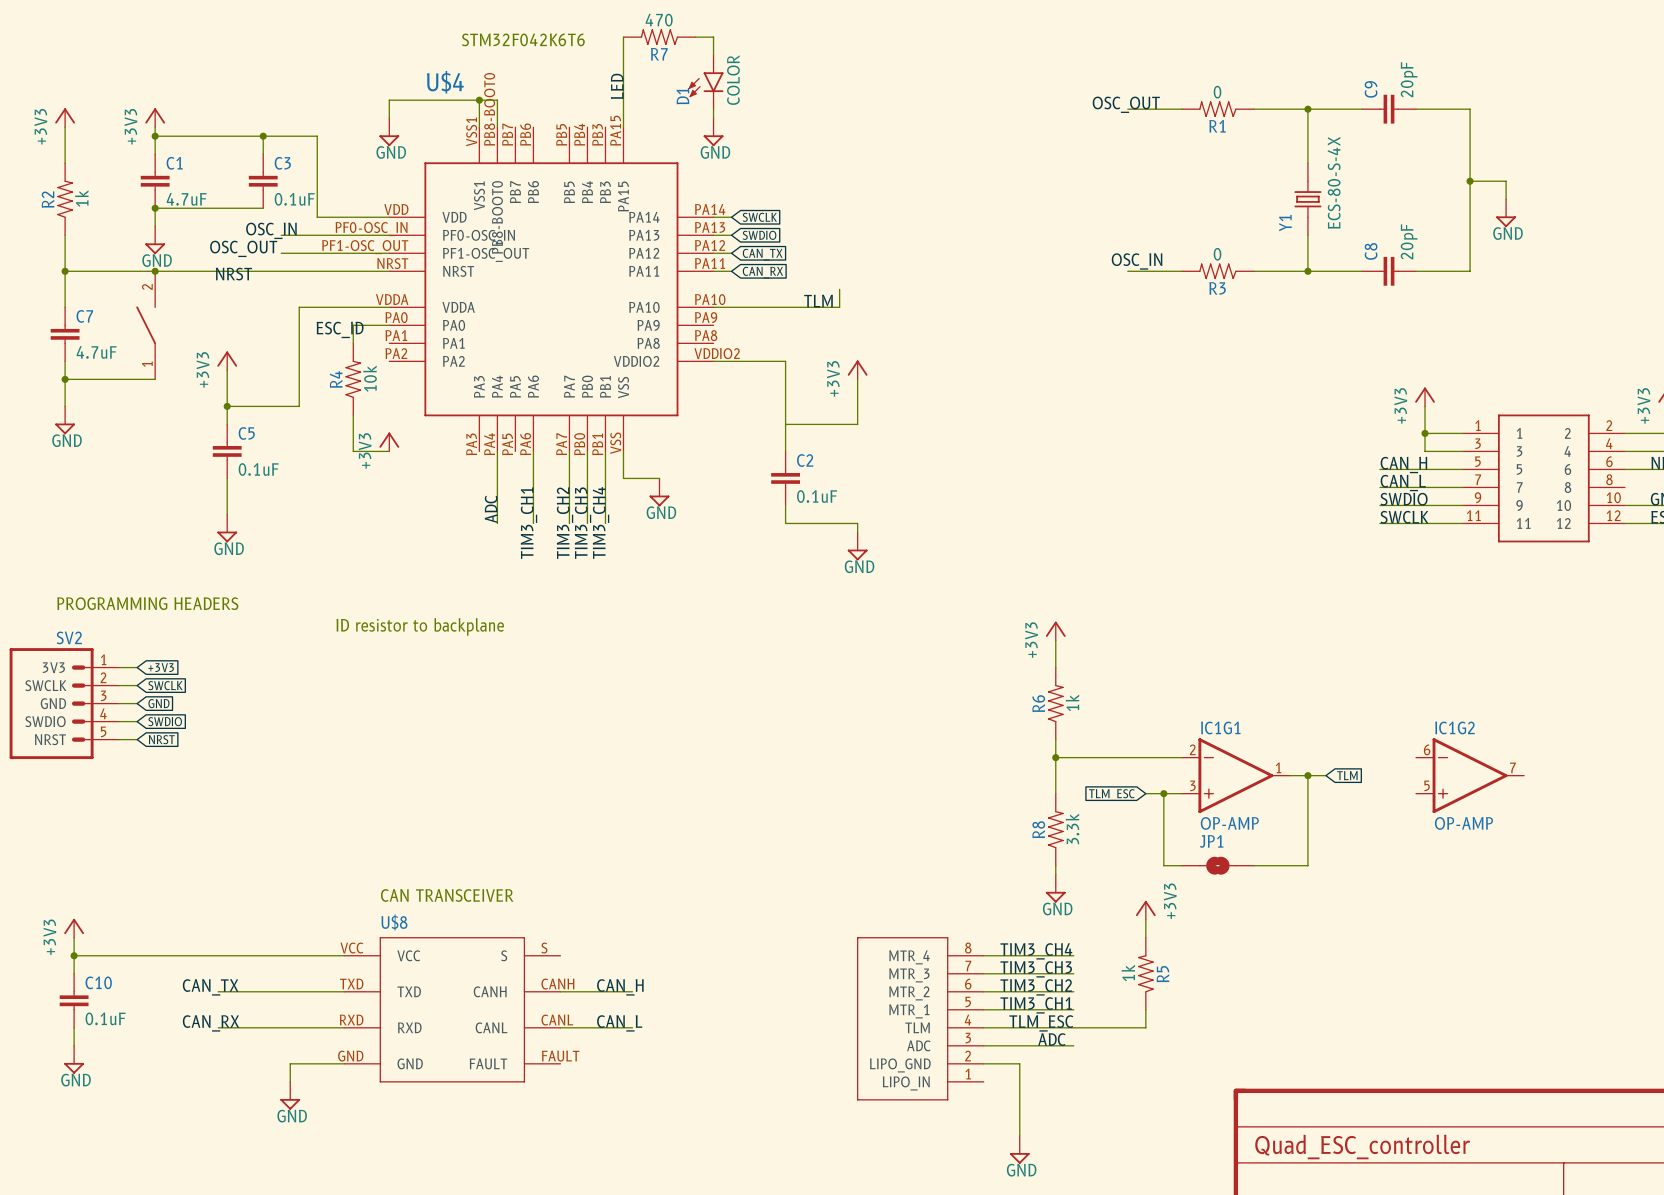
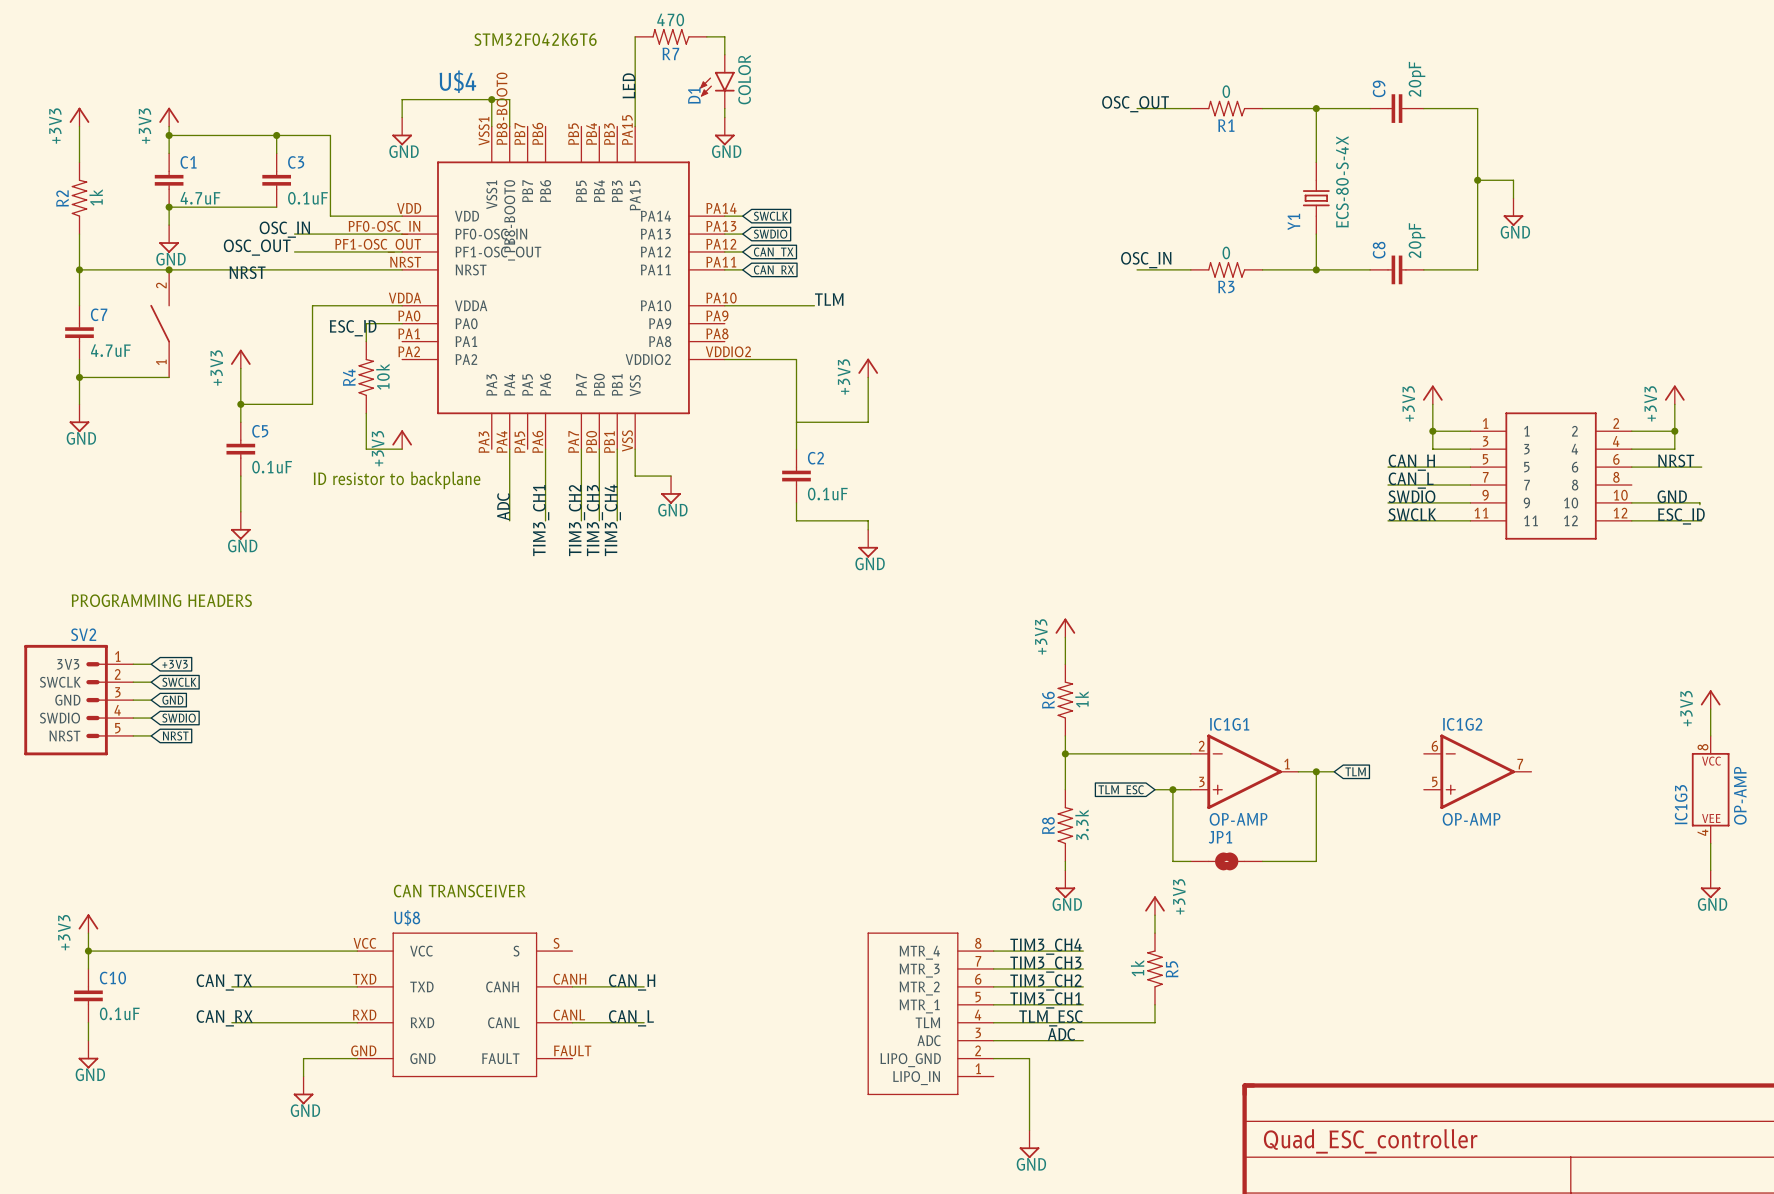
wire: (839, 289) (839, 307) (803, 307) -> none
text position: ID resistor to backplane (420, 626) -> ID resistor to backplane (397, 480)

